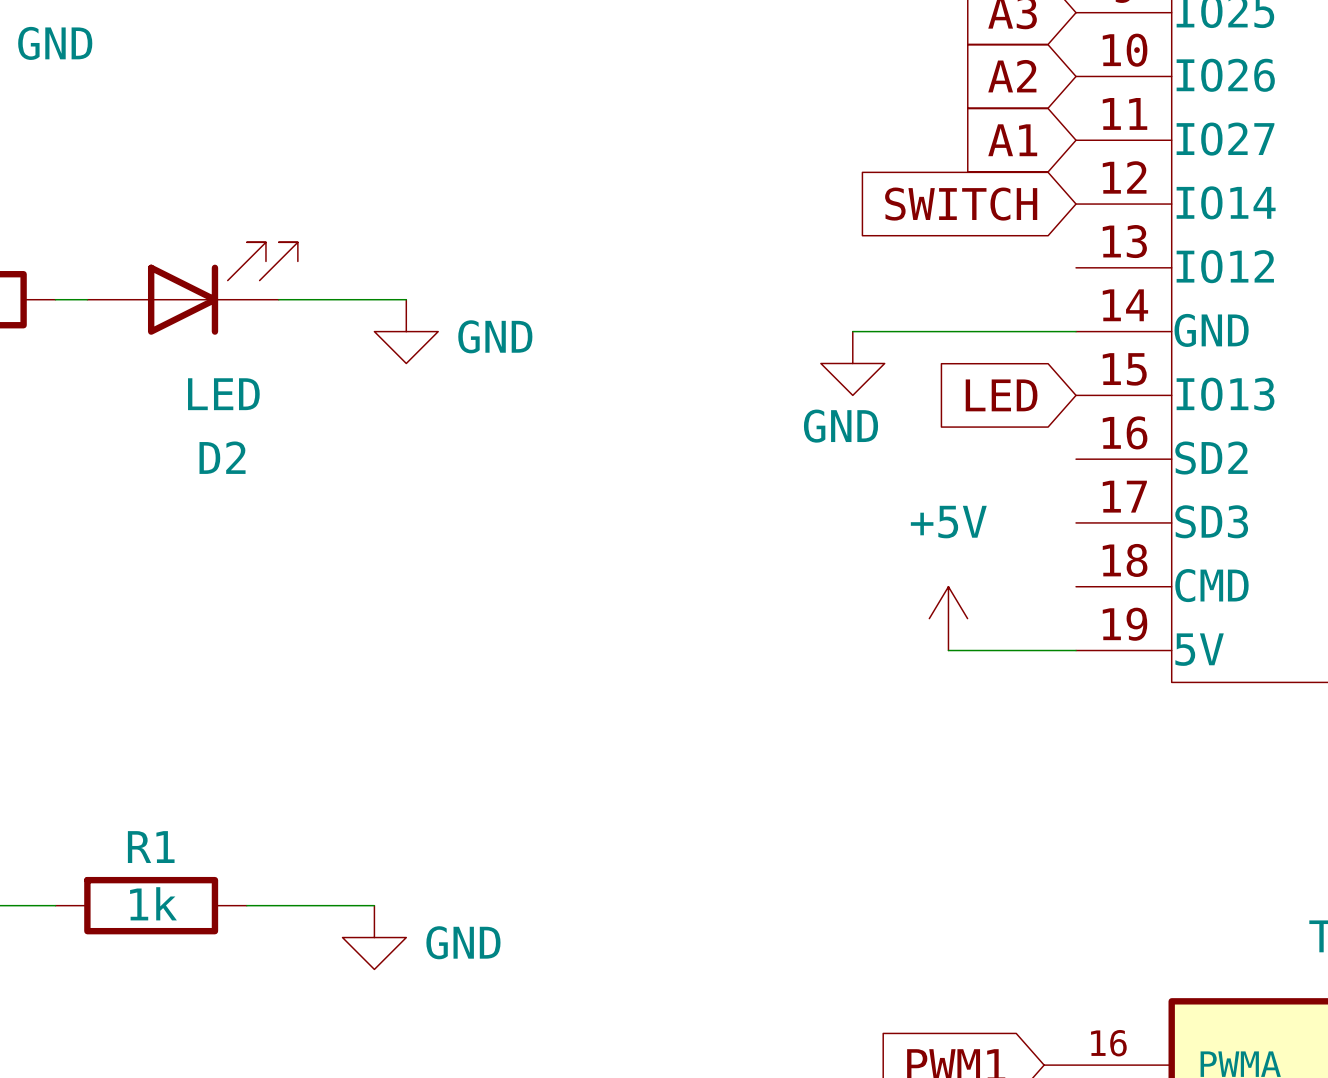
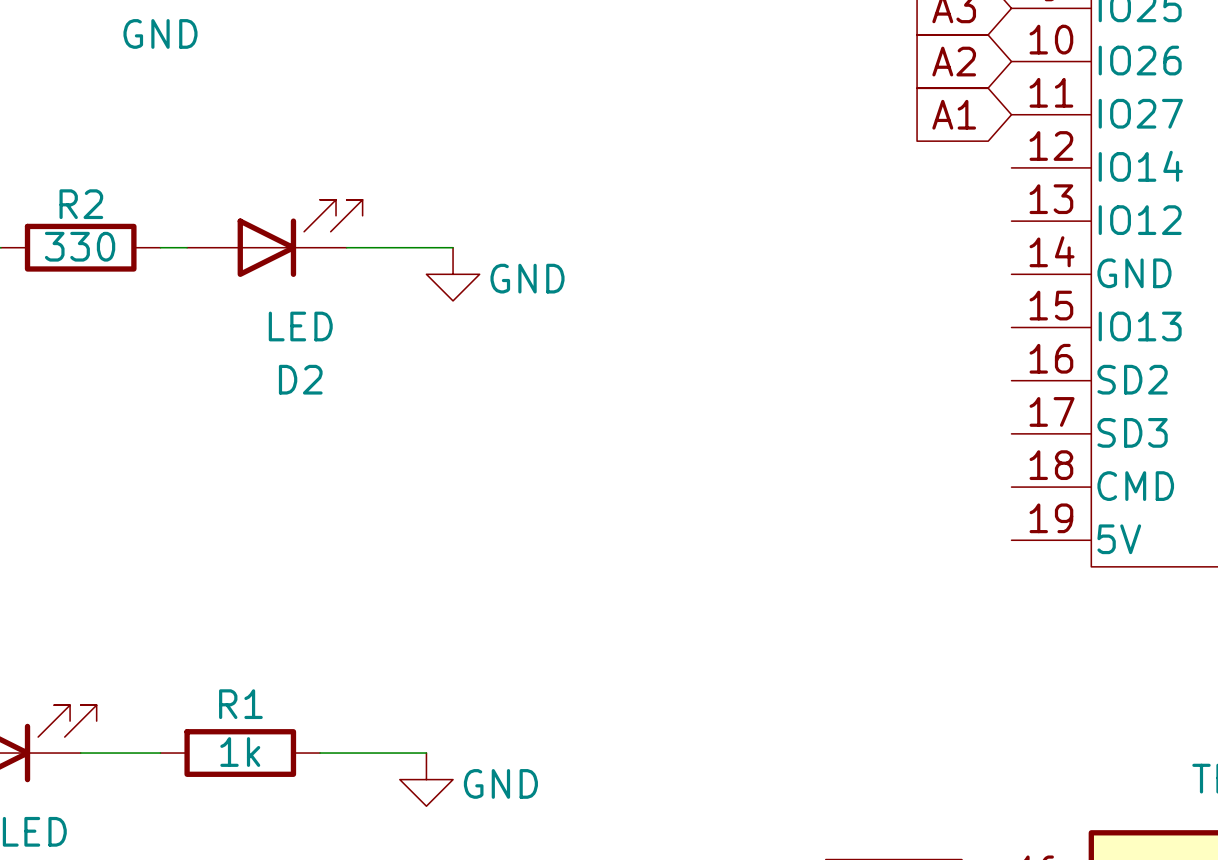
global label: SWITCH (961, 204) -> none
wire: (852, 331) (1076, 331) -> none
power symbol: GND (852, 363) -> none
global label: LED (1001, 395) -> none
power symbol: +5V (948, 618) -> none
wire: (948, 650) (1076, 650) -> none

